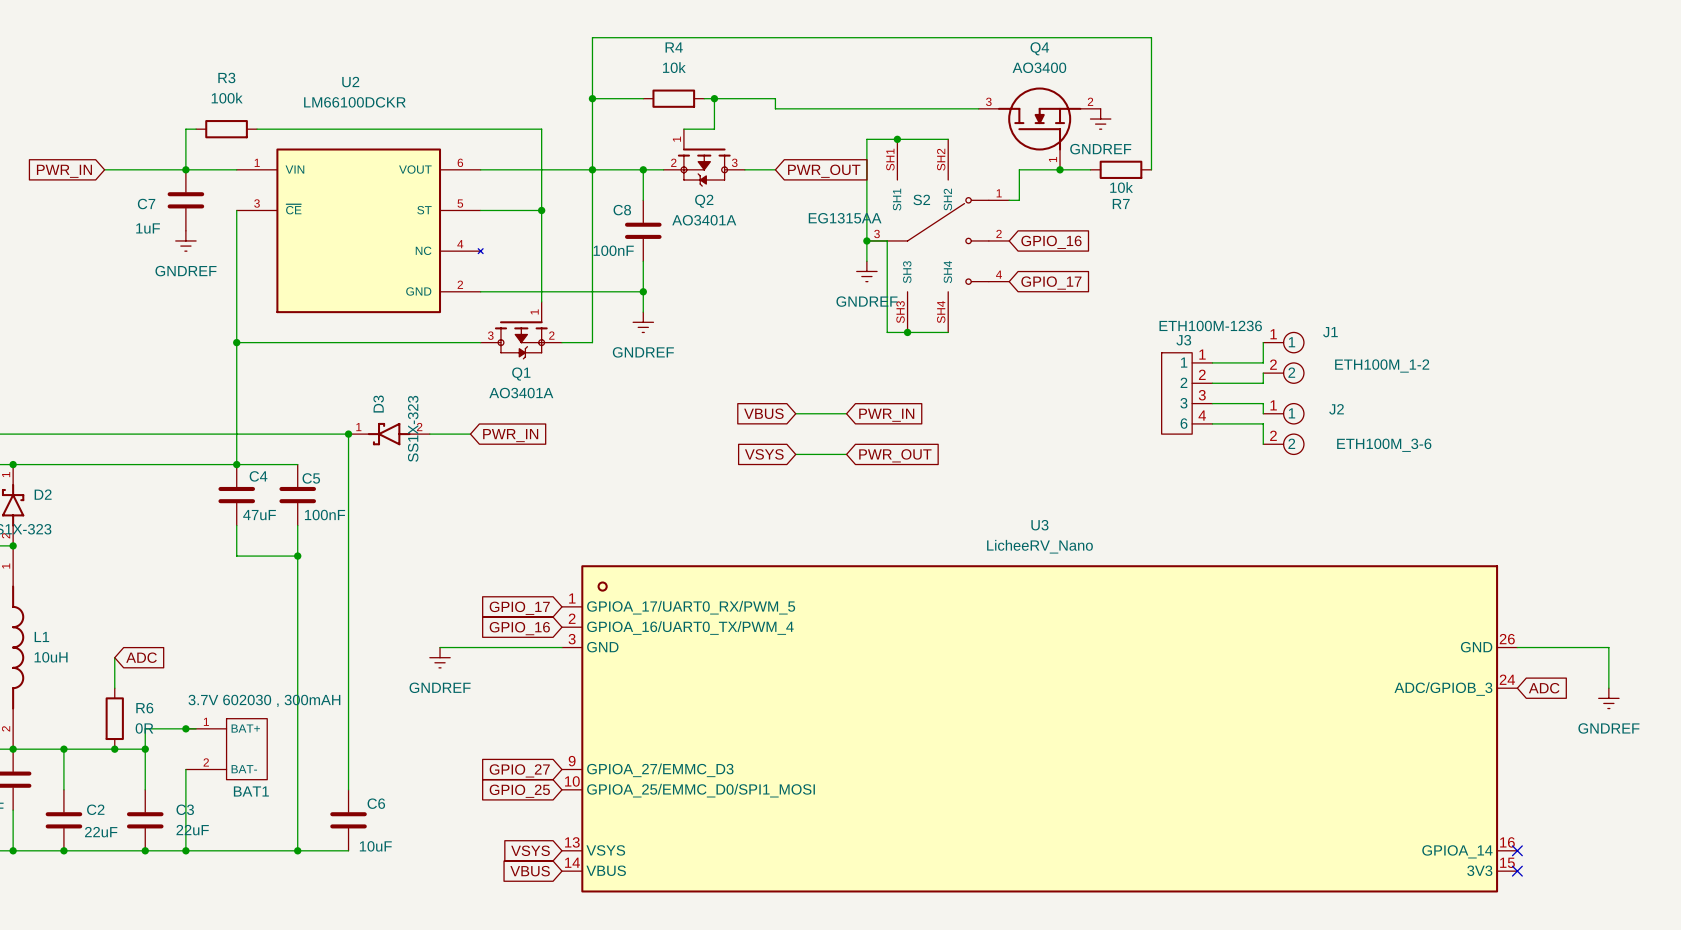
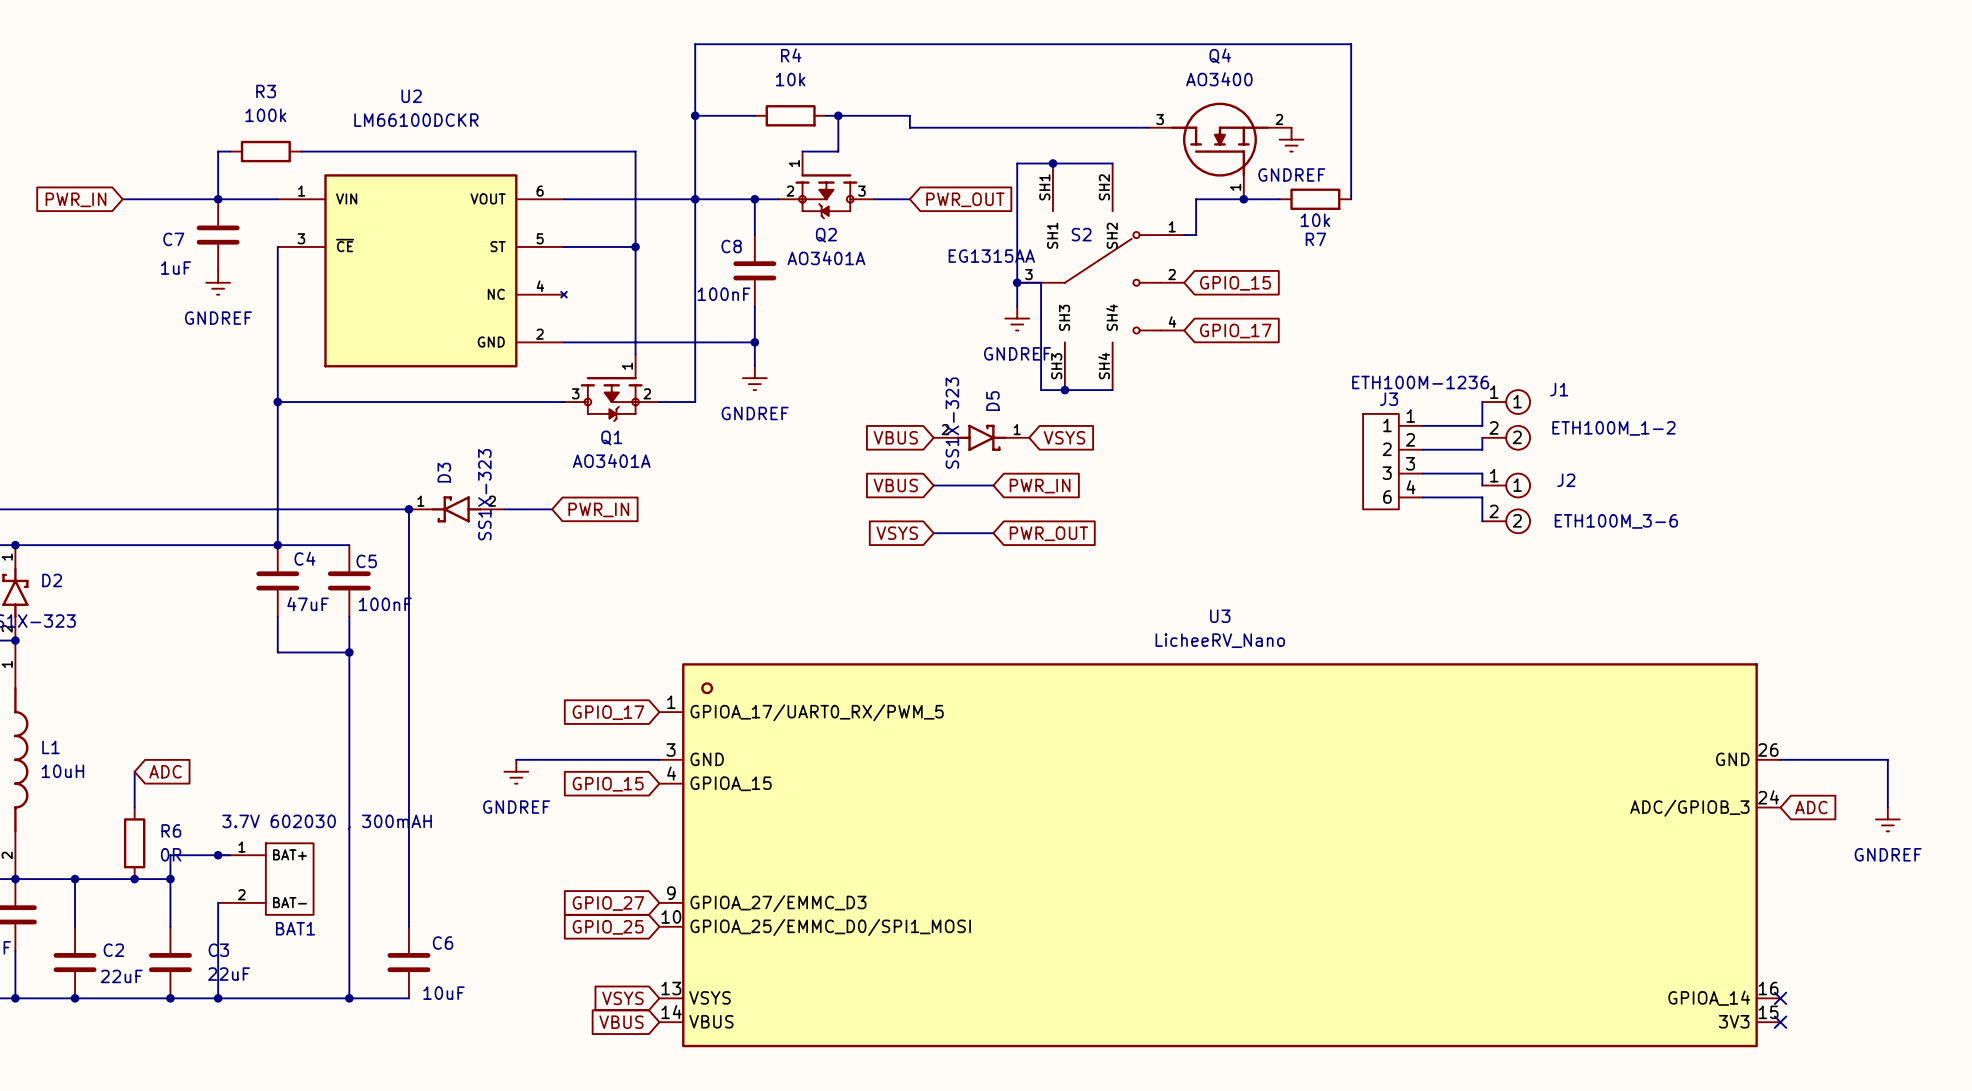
global label: GPIO_16 (1051, 242) -> GPIO_15 (1235, 283)
global label: none -> VBUS (895, 437)
D5: none -> SS1X-323 (981, 437)
global label: none -> VSYS (1064, 437)
U3 symbol: [561, 565, 1518, 893] -> [659, 663, 1781, 1048]
global label: GPIO_16 (519, 628) -> none
global label: none -> GPIO_15 (608, 784)

